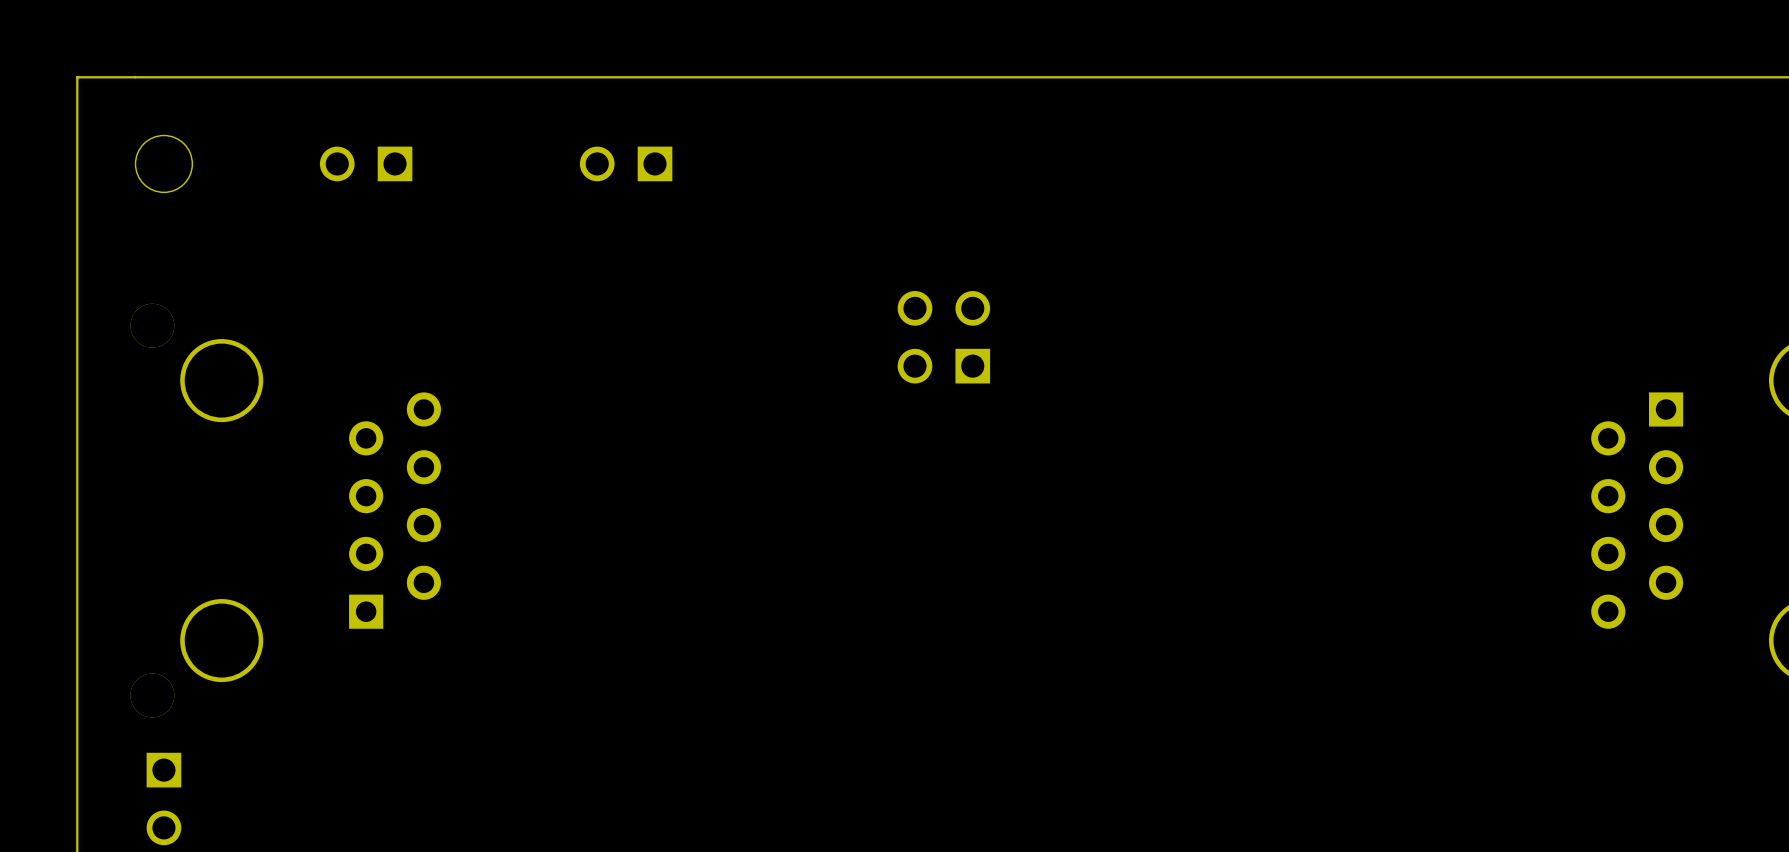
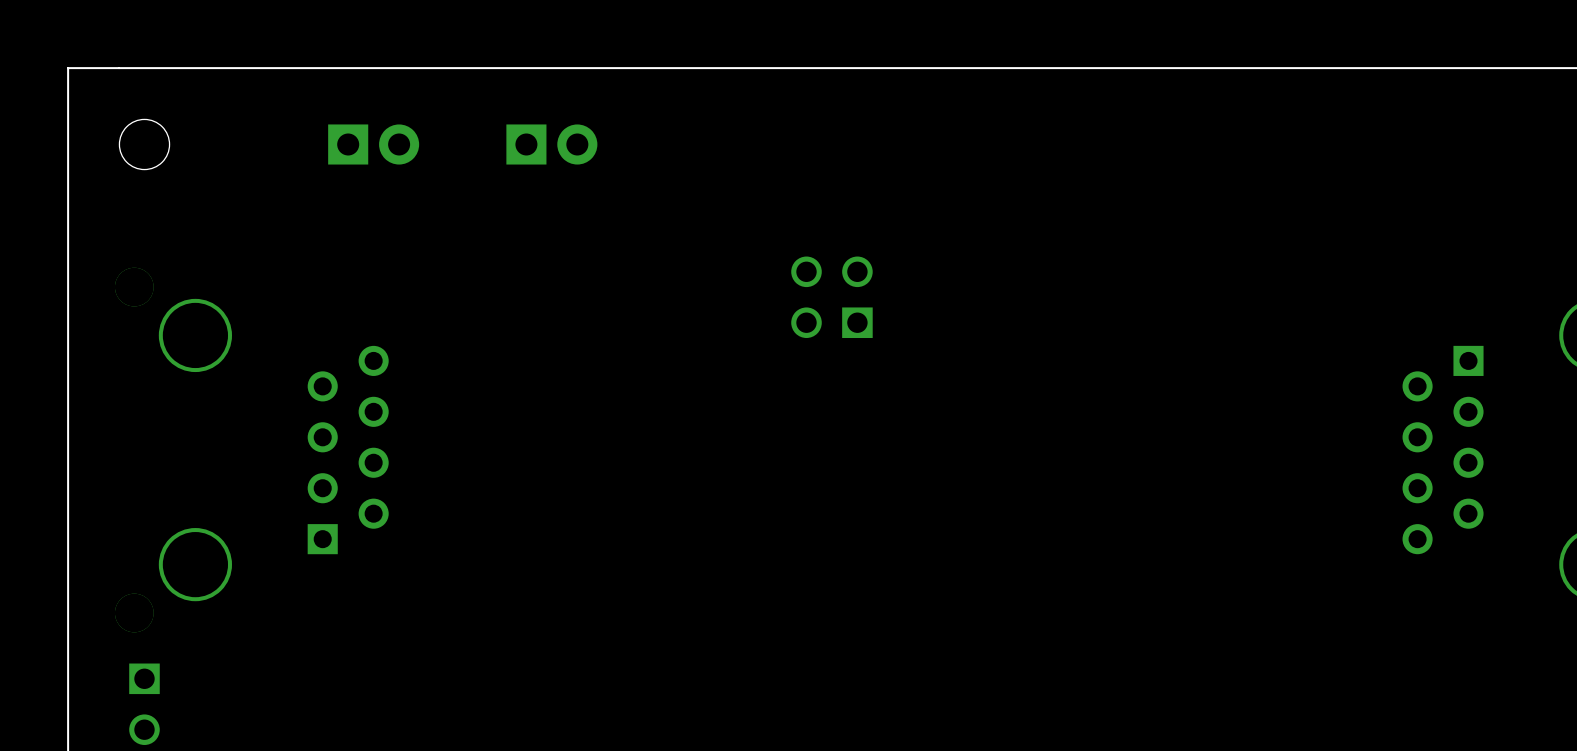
part footprint: [579, 146, 673, 182] -> [506, 124, 598, 165]
part: (366, 163) -> none
part: none -> (373, 144)

